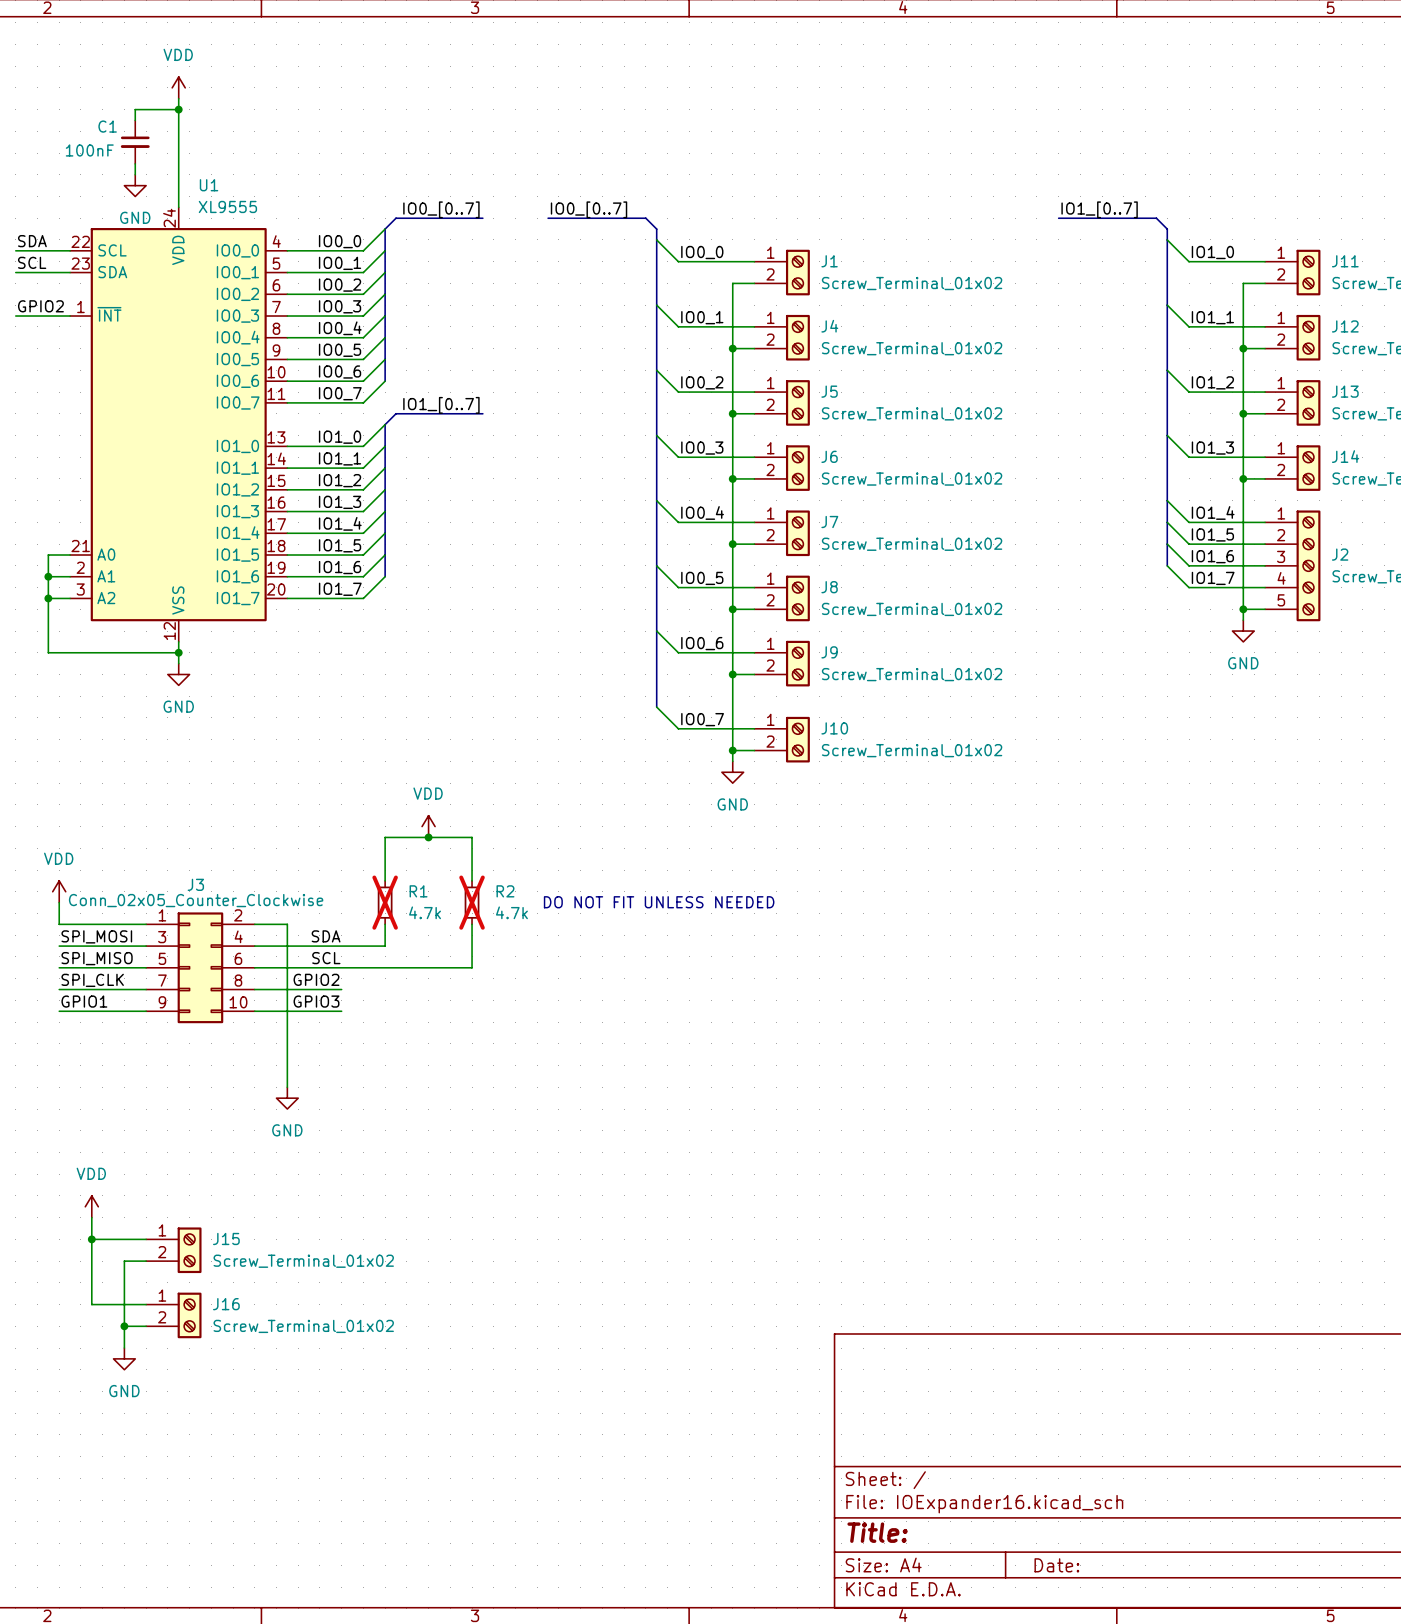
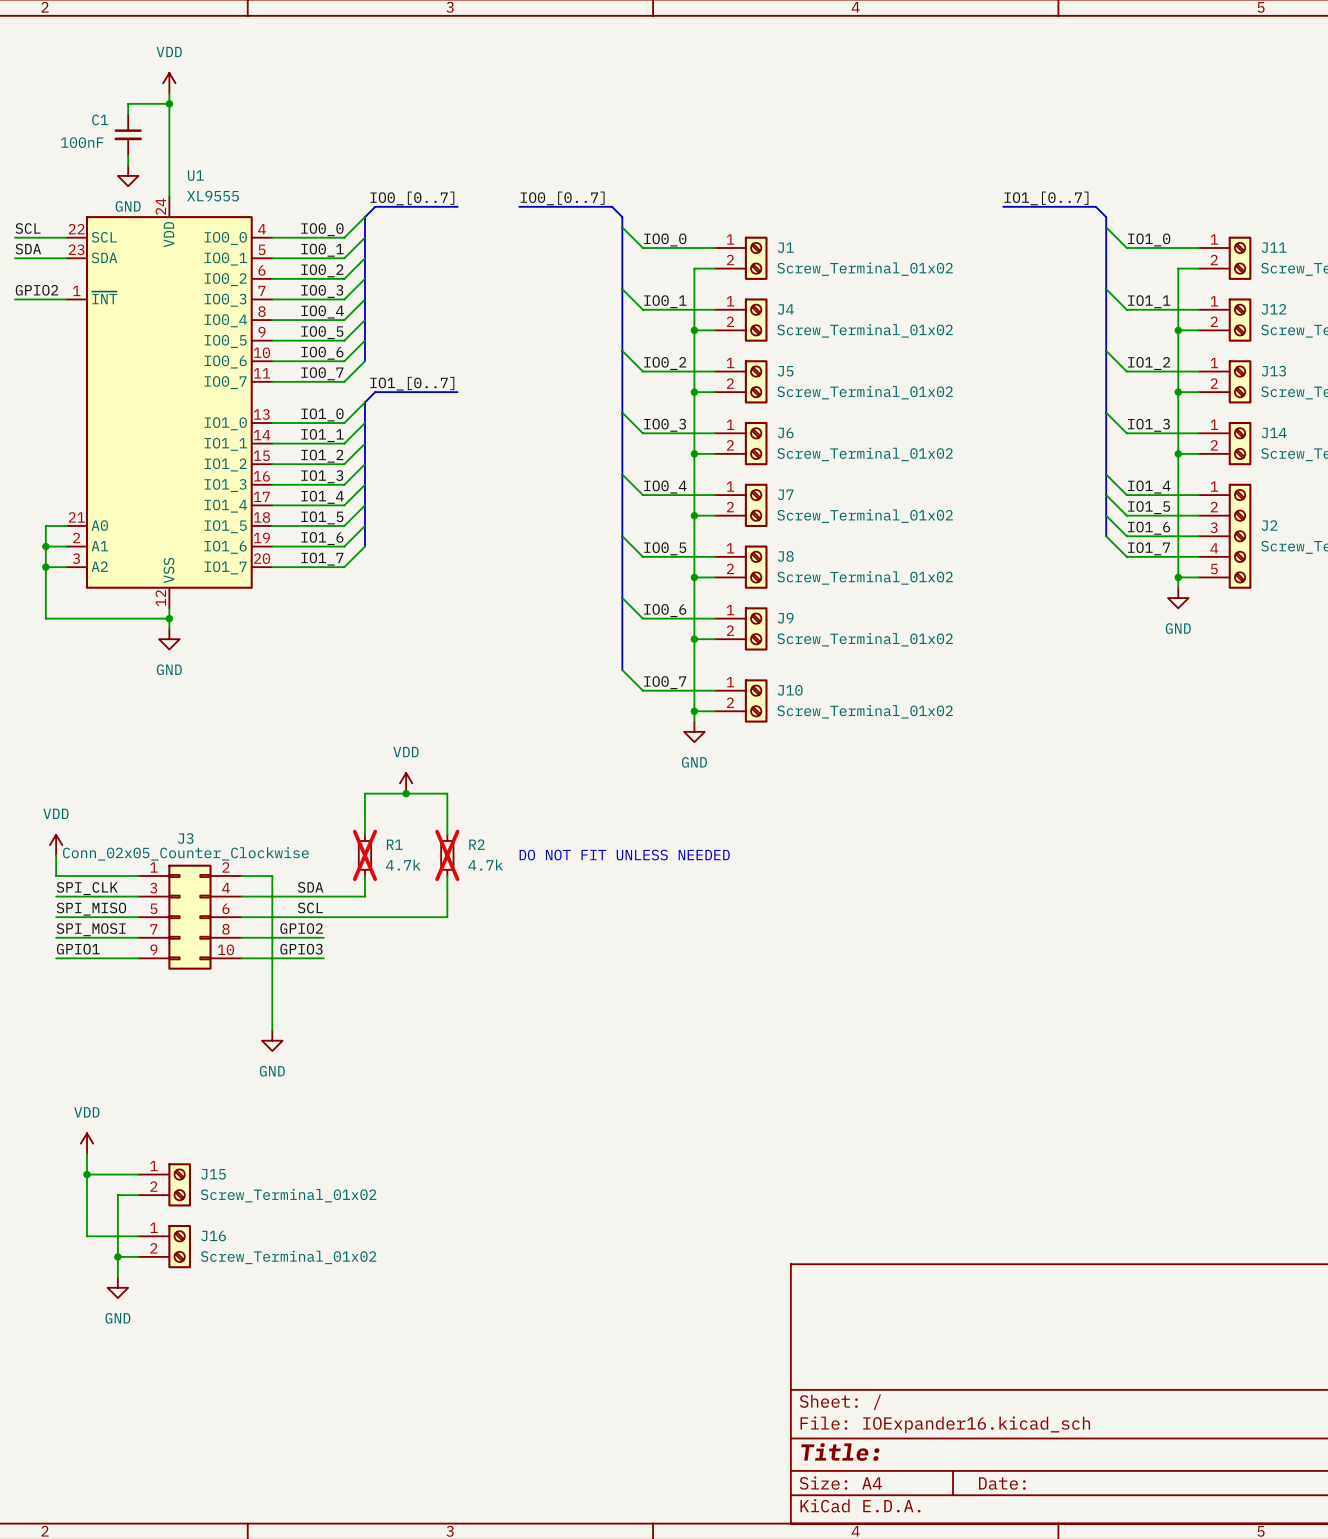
label: SDA (32, 241) -> SCL (28, 228)
label: SCL (32, 262) -> SDA (28, 249)
label: SPI_MOSI (96, 936) -> SPI_CLK (87, 888)
label: SPI_CLK (92, 980) -> SPI_MOSI (91, 929)

